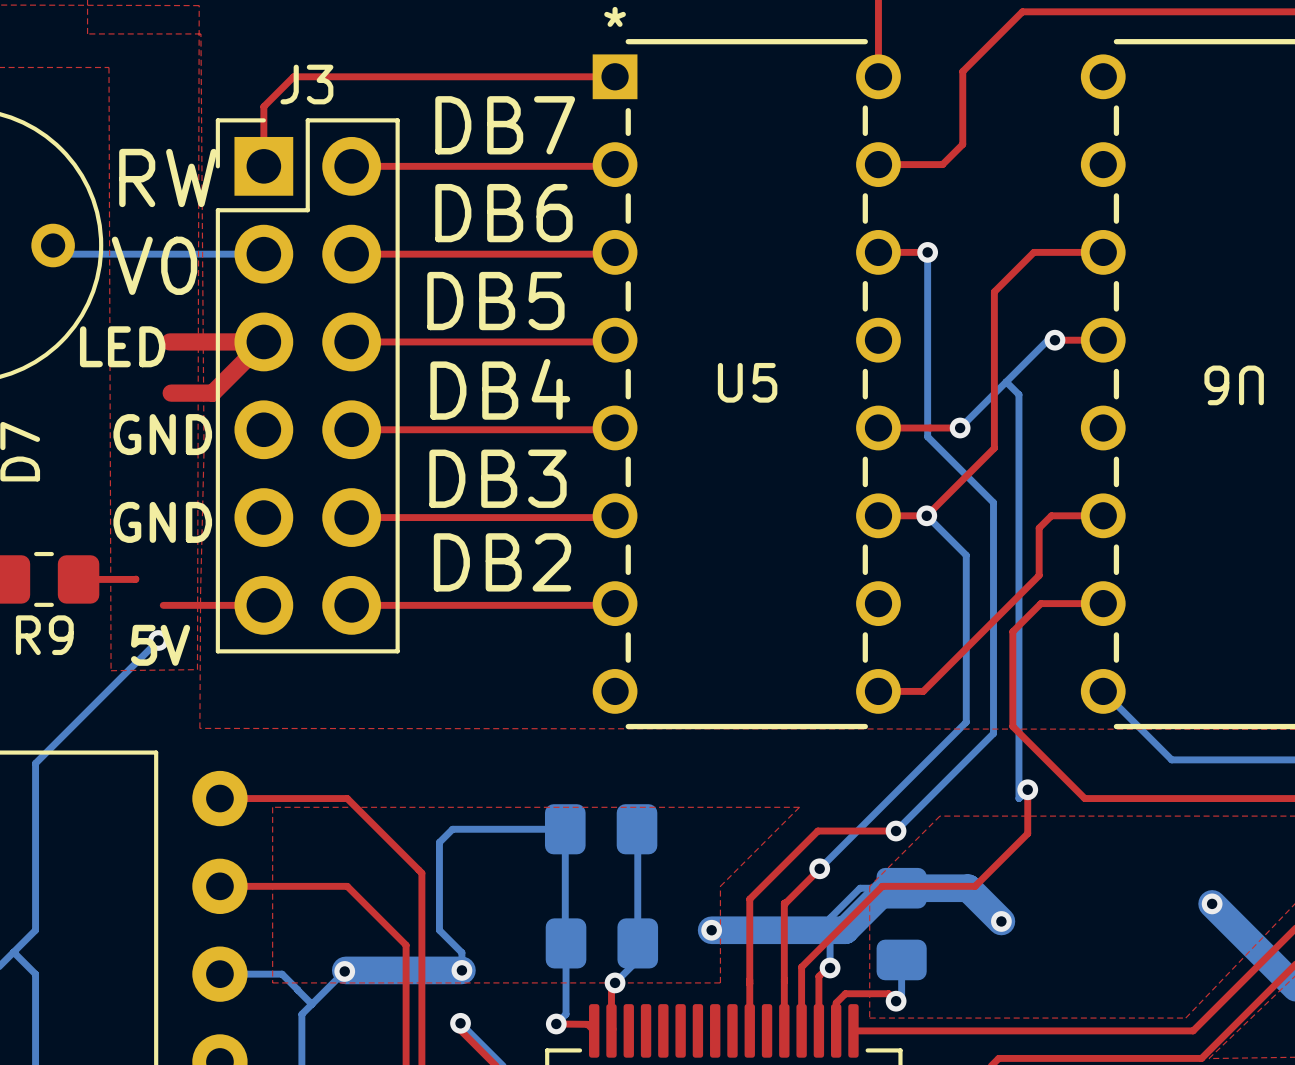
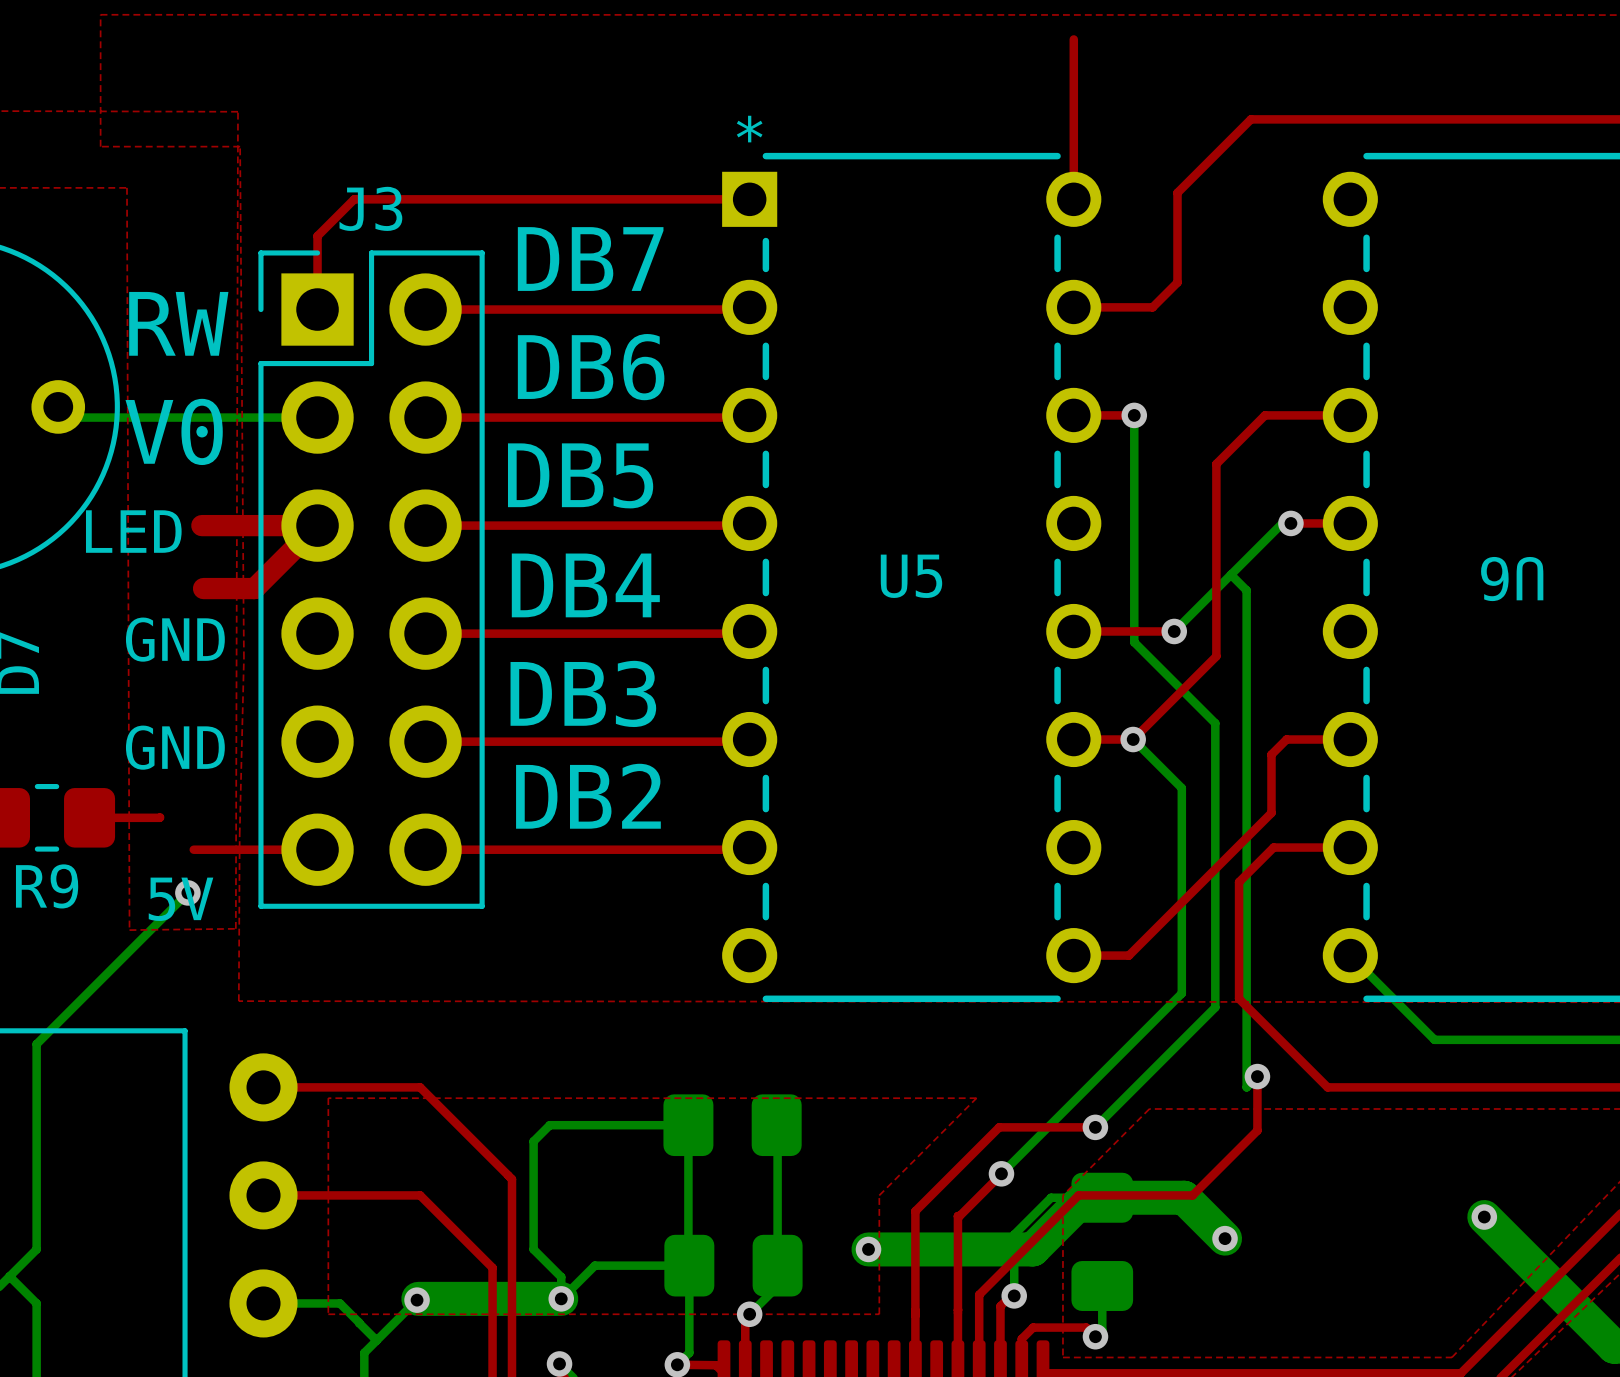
bottom track: none -> (689, 1265) (594, 1265) (563, 1296)

